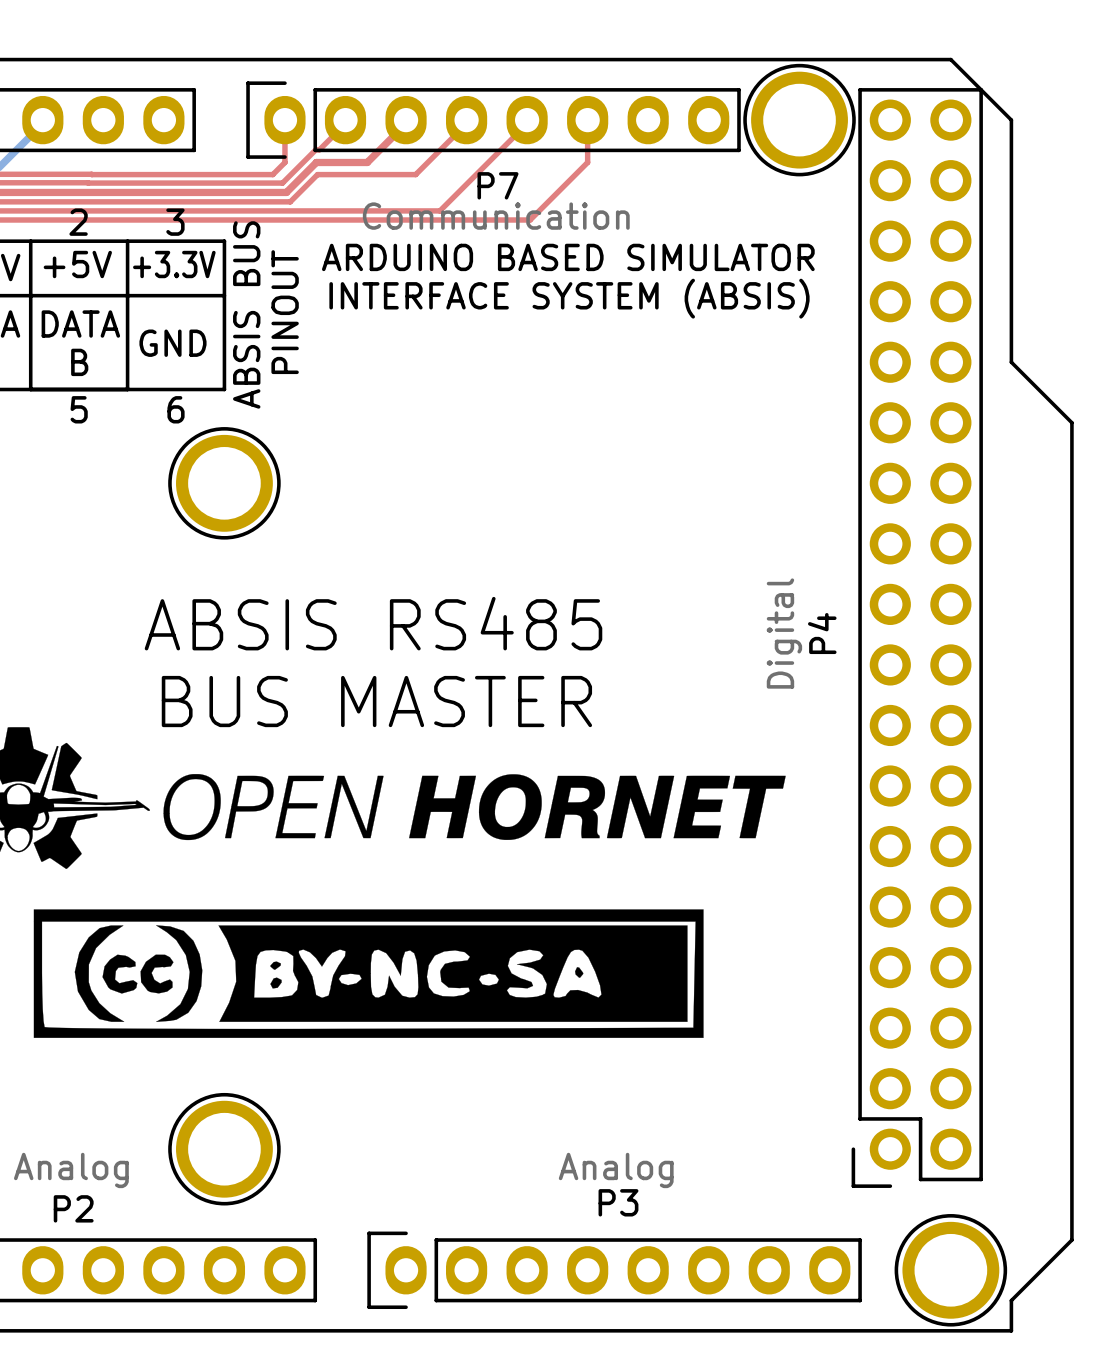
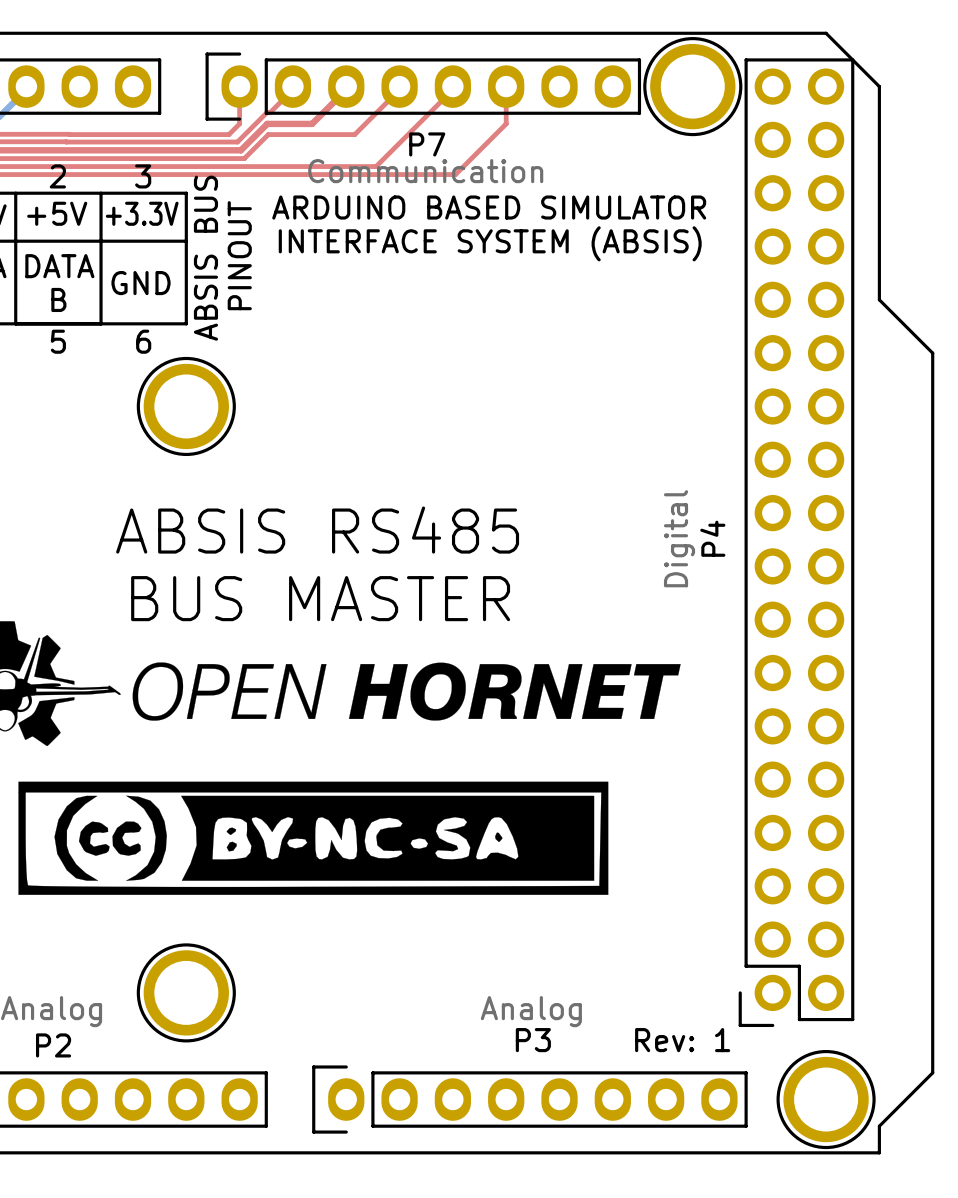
text: none -> Rev: 1 (682, 1040)

